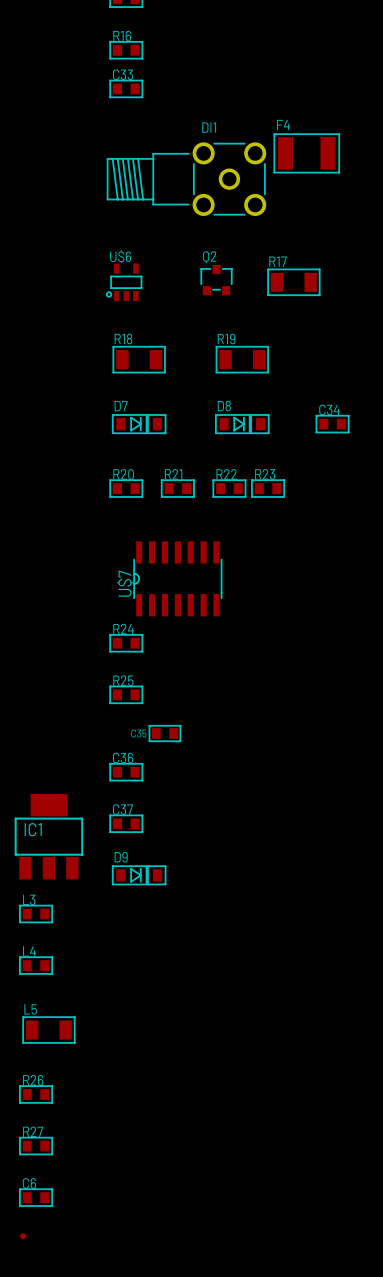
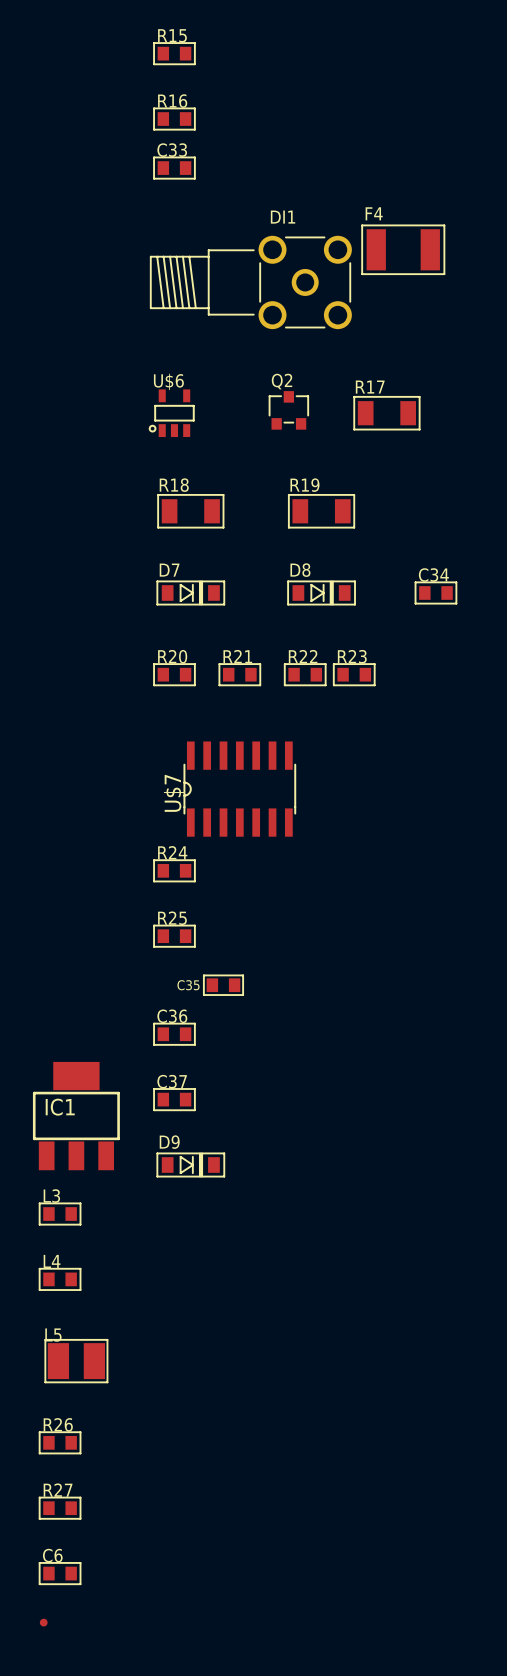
L5 footprint: [22, 1016, 76, 1044] -> [44, 1339, 109, 1384]

